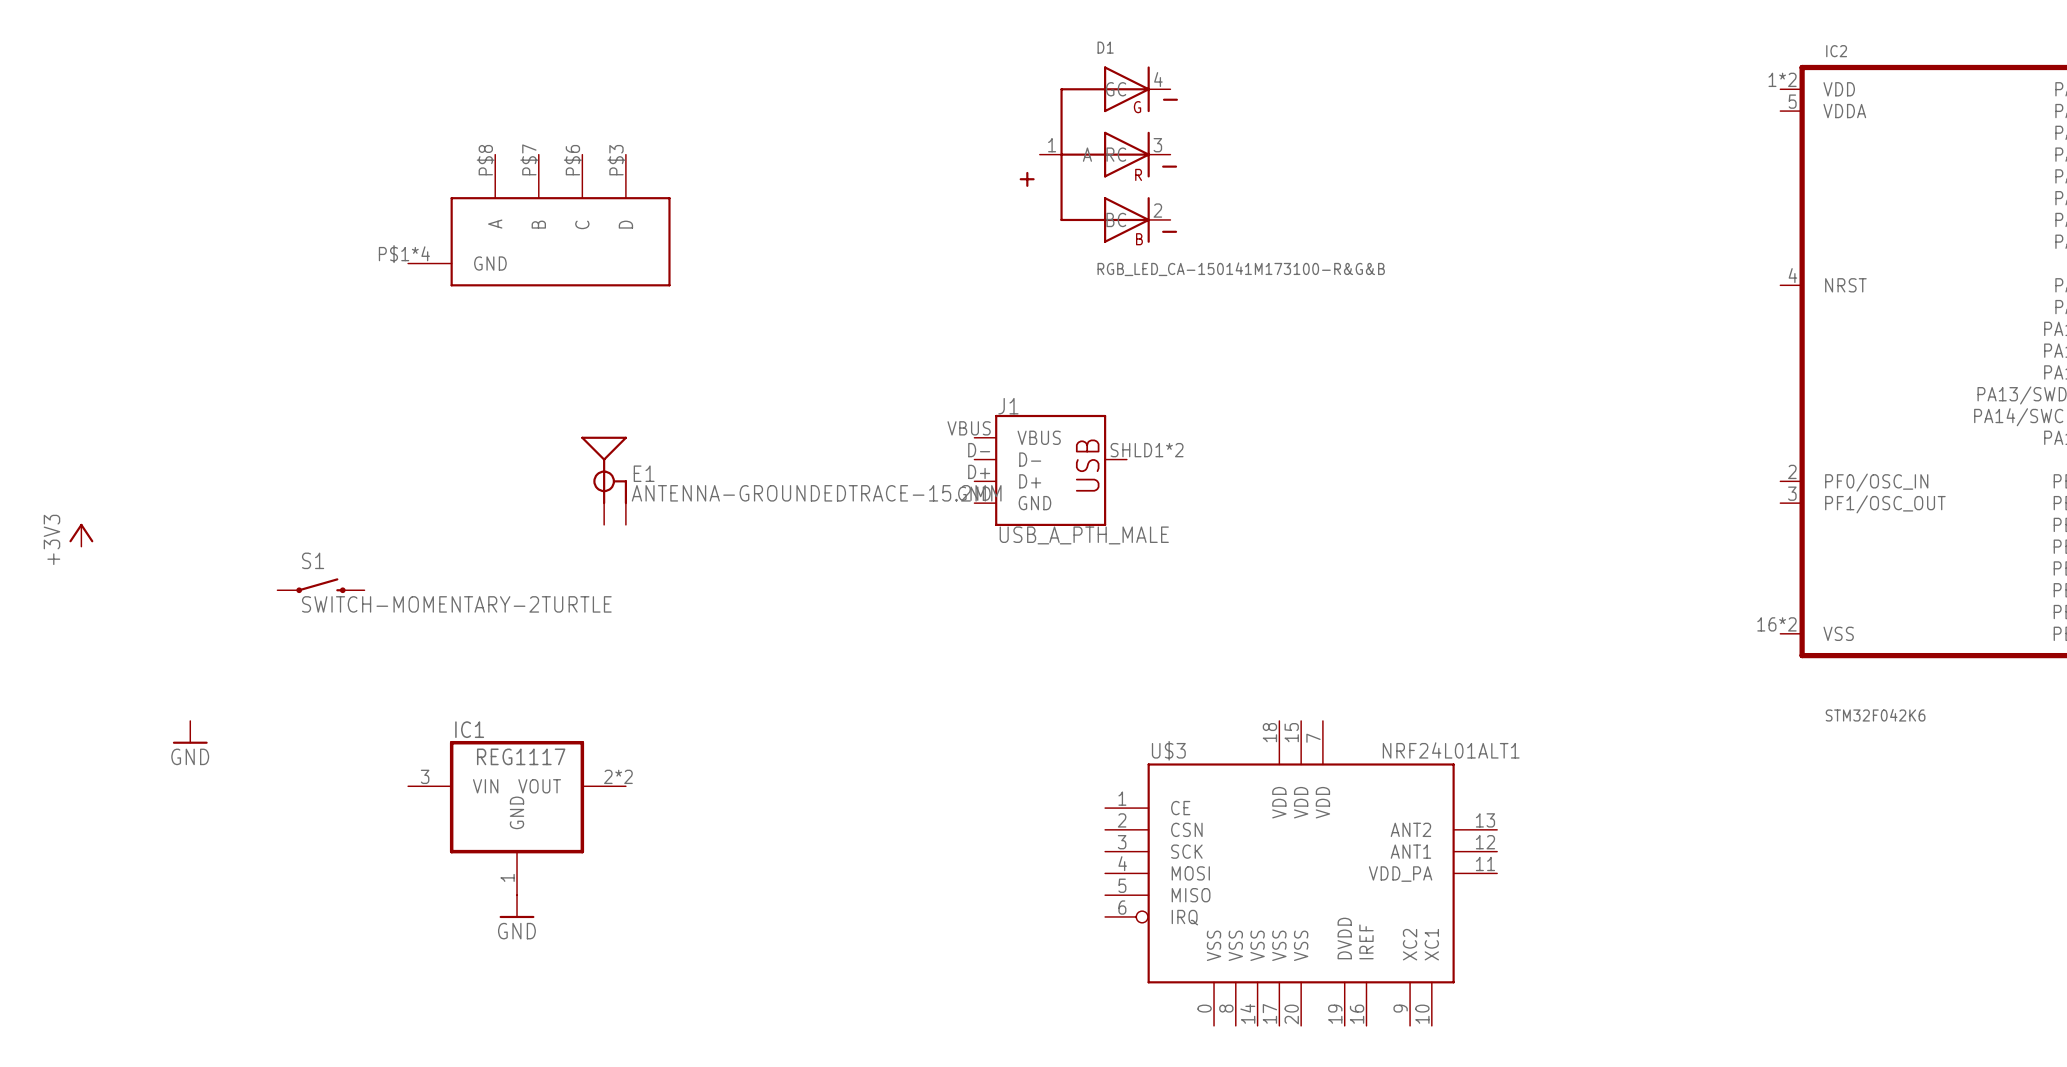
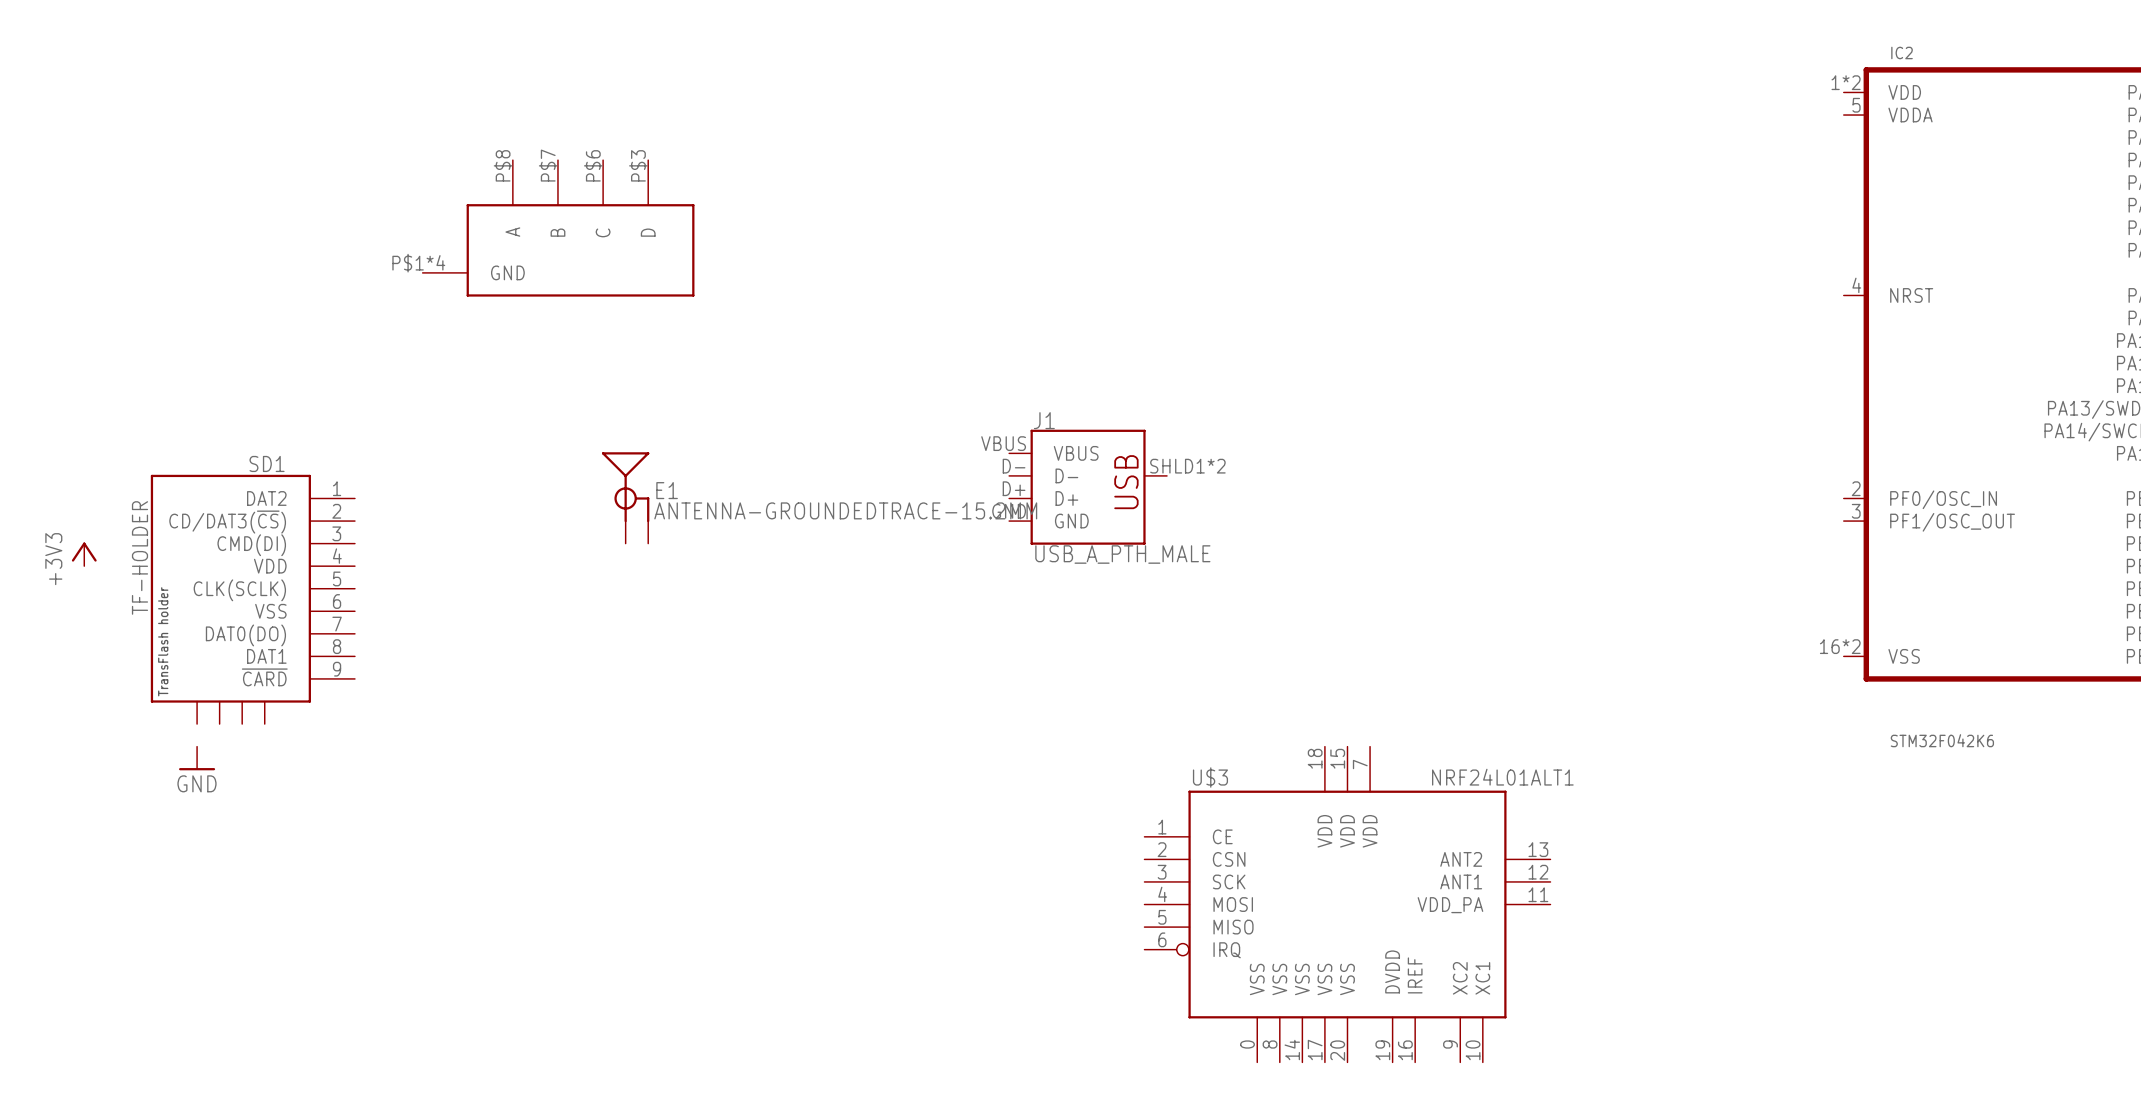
D1: RGB_LED_CA-150141M173100-R&G&B (1098, 154) -> none
SD1: none -> TF-HOLDER (252, 599)
S1: SWITCH-MOMENTARY-2TURTLE (320, 585) -> none
IC1: REG1117 (517, 818) -> none
power symbol: GND (517, 906) -> none

